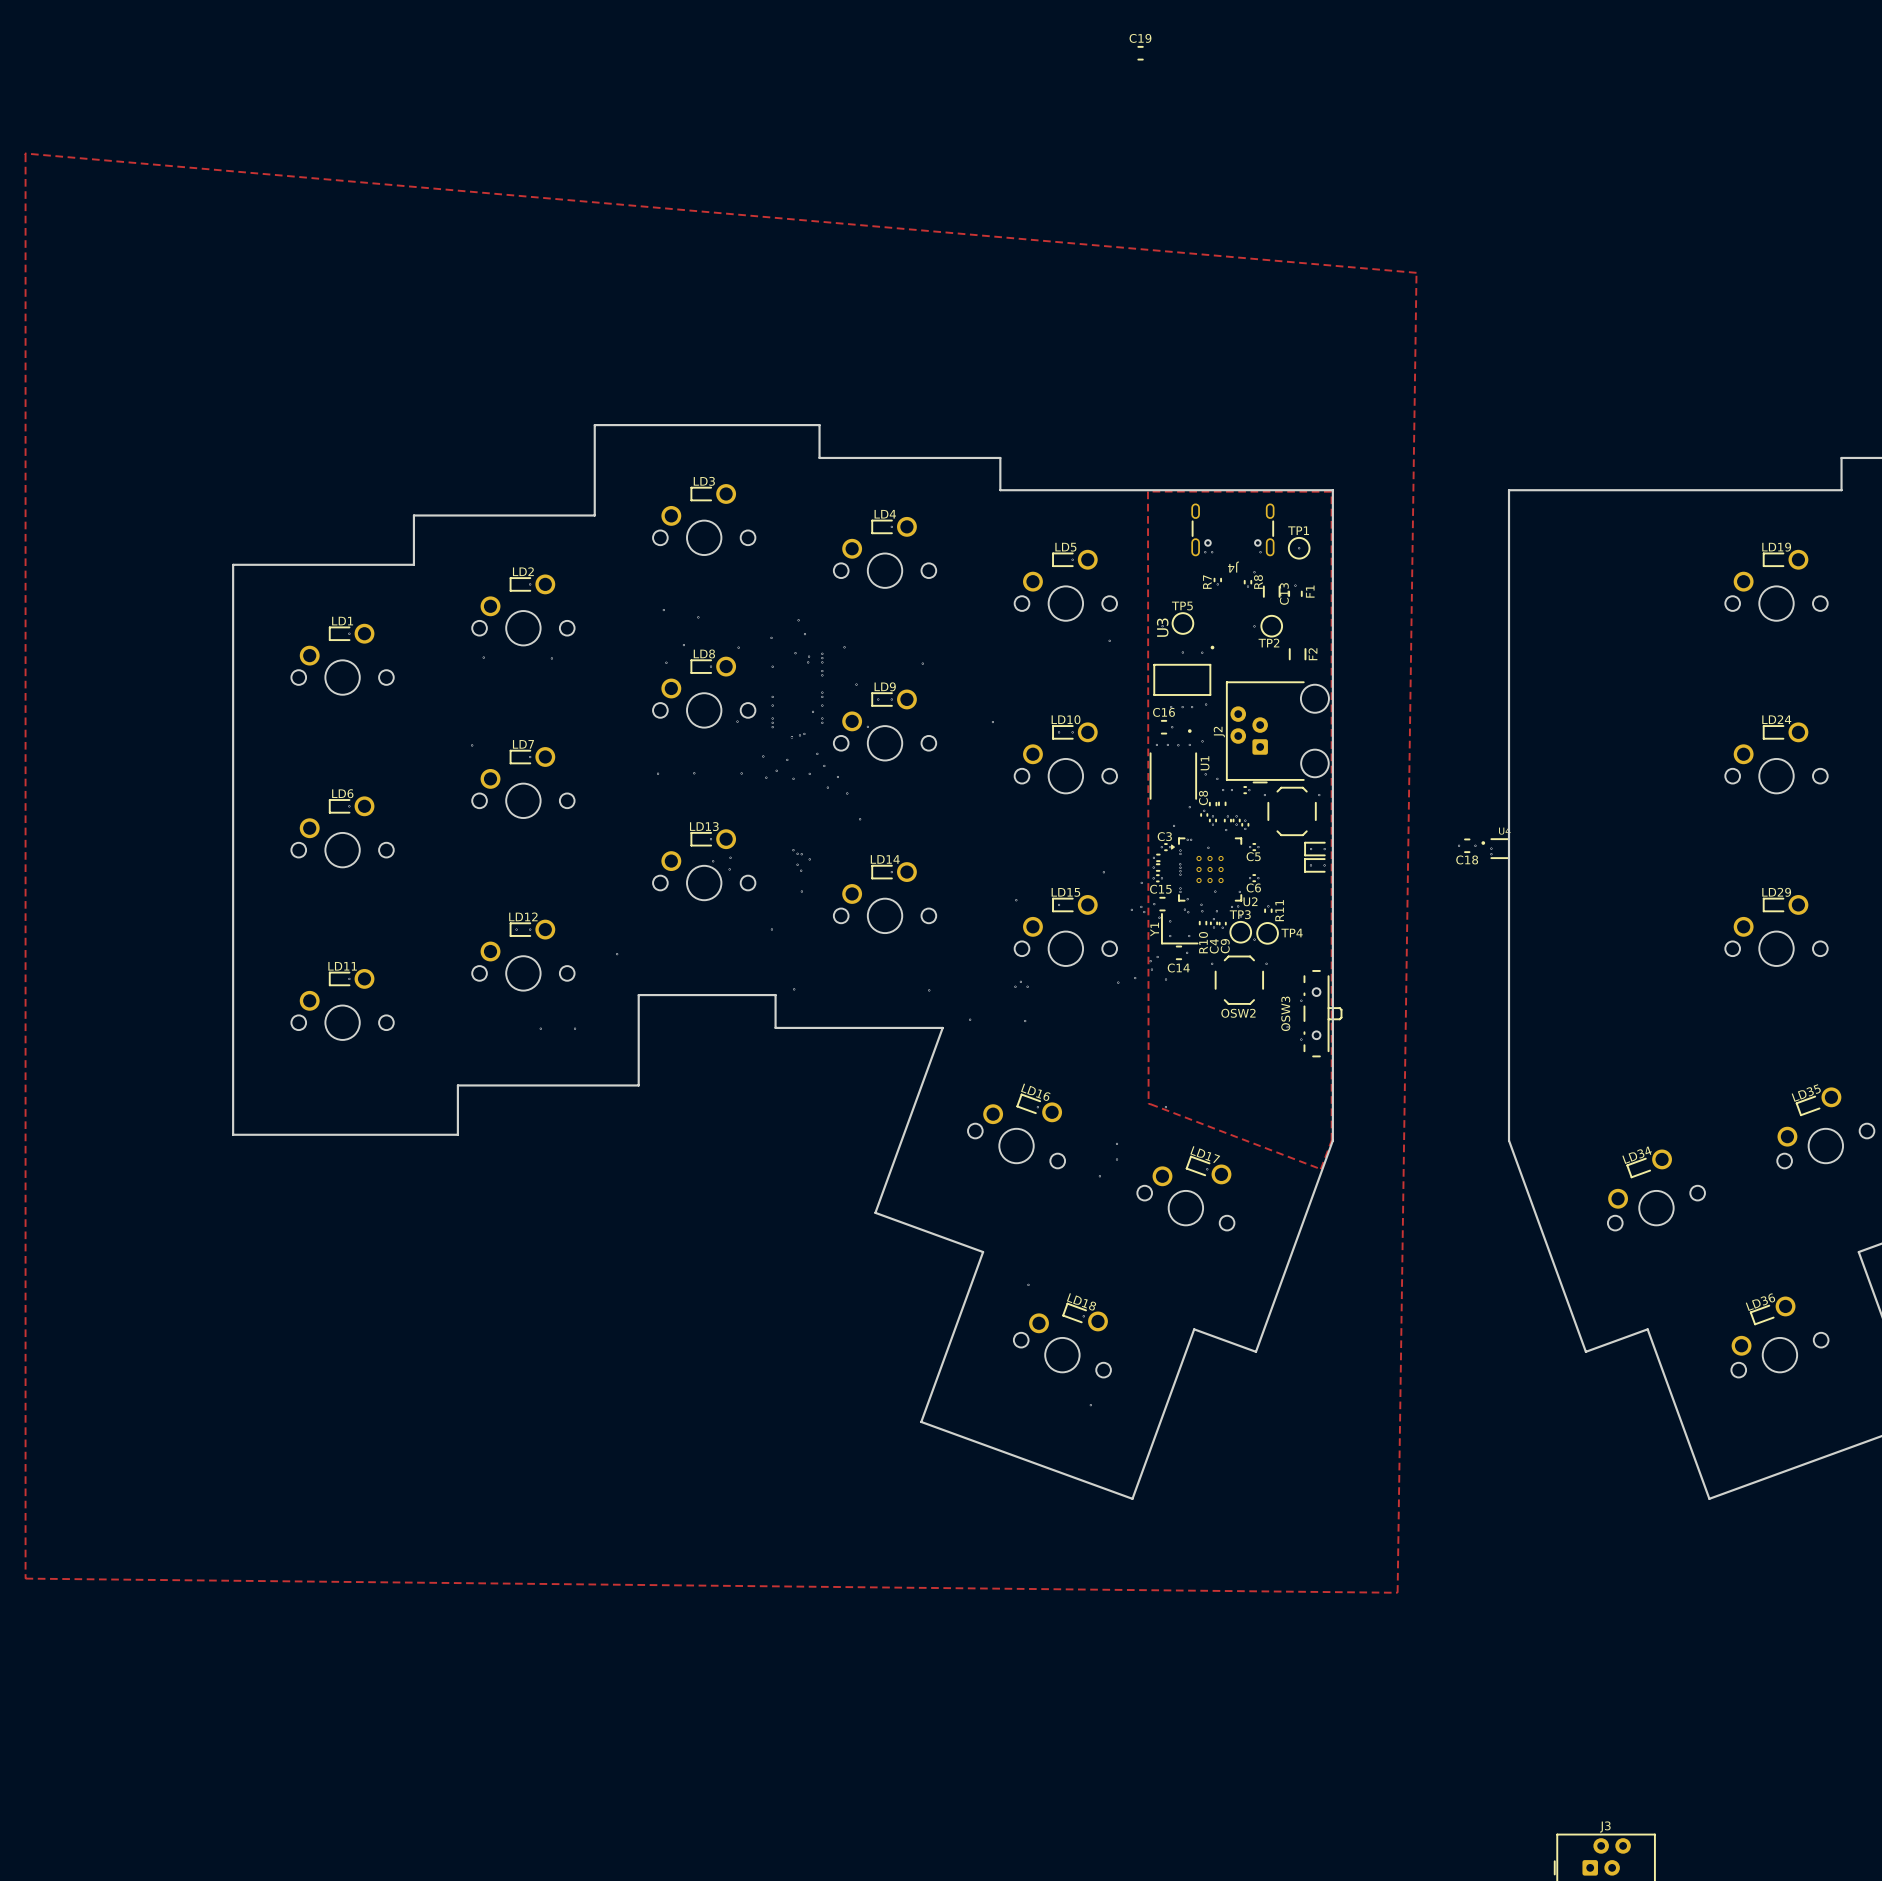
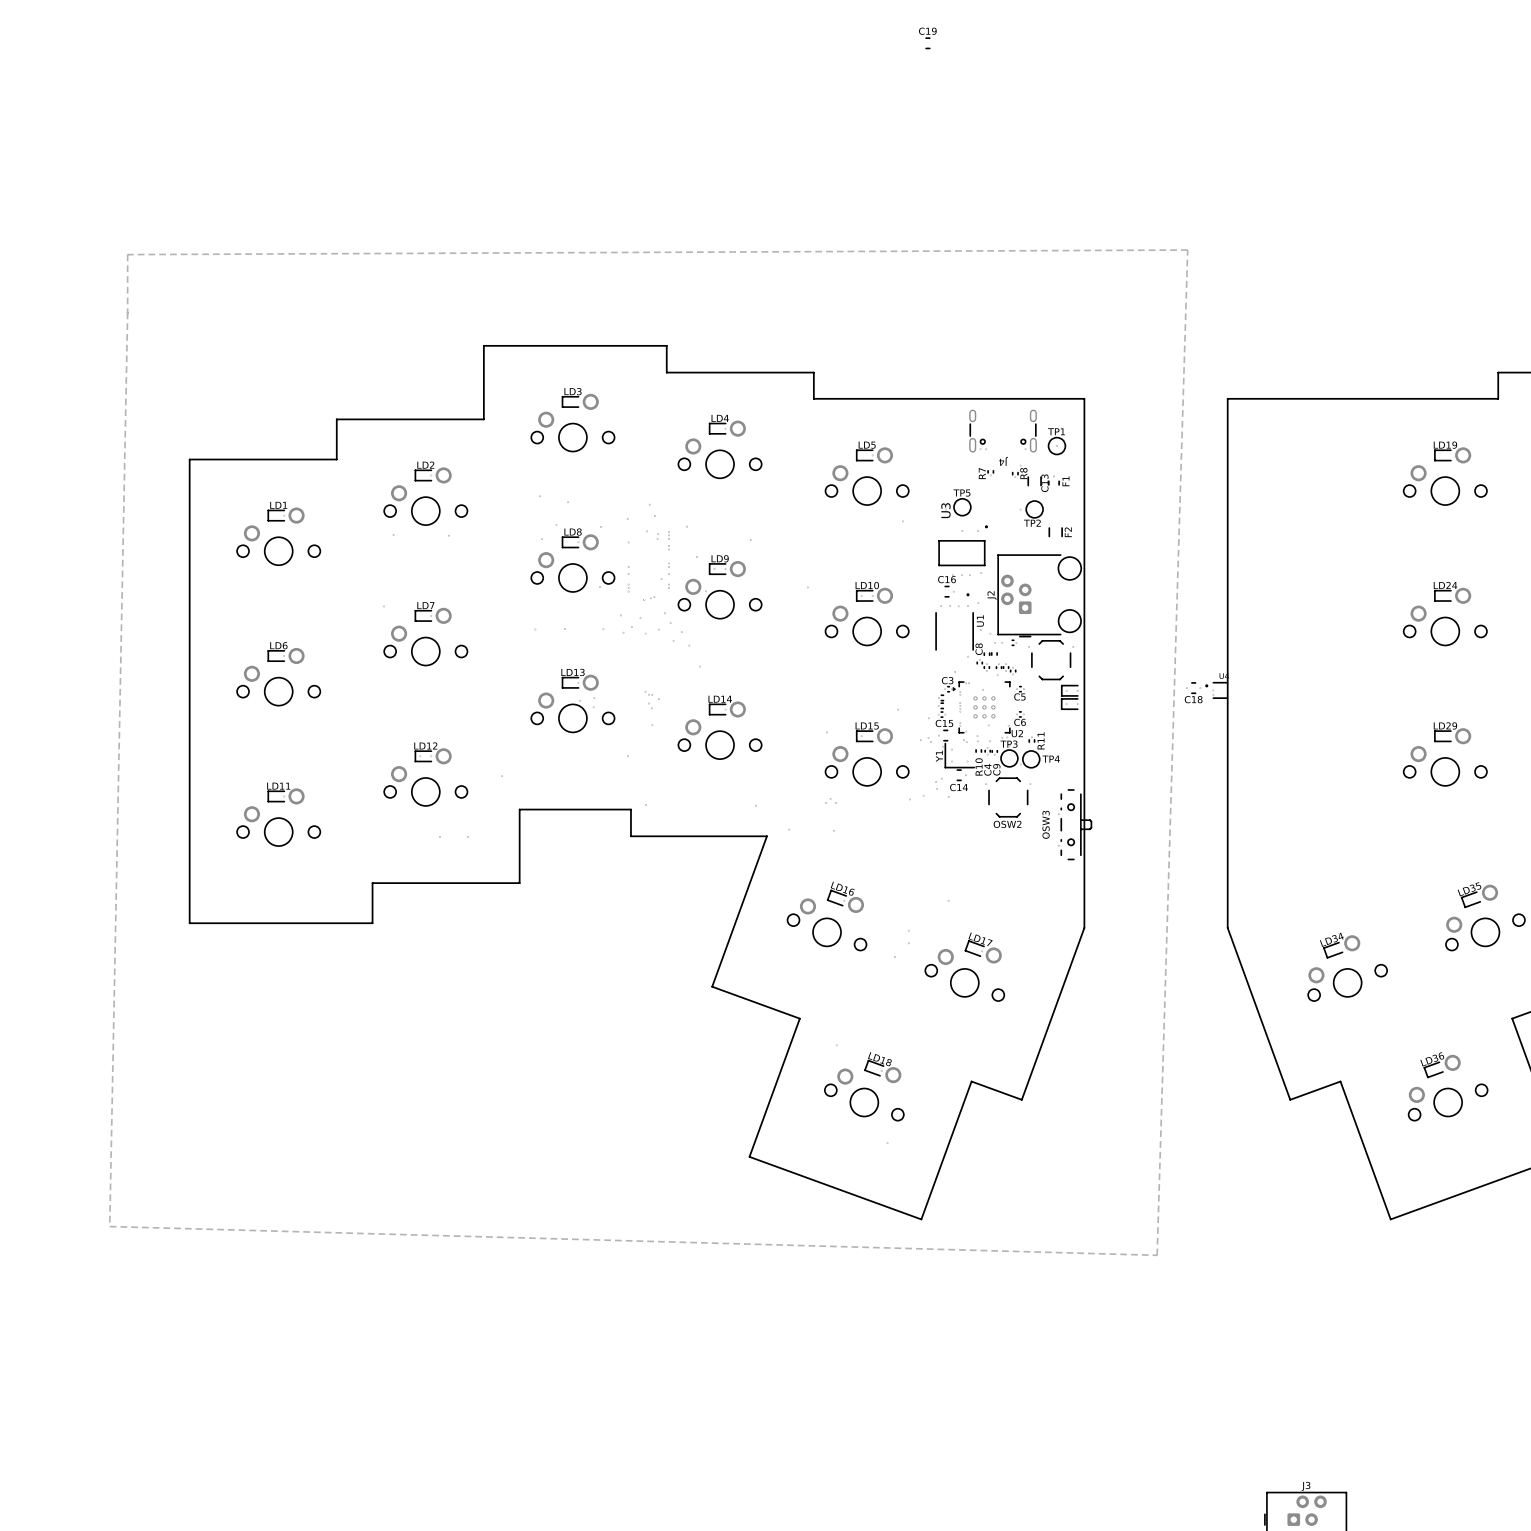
zone outline: (24, 153) (1416, 272) (1397, 1592) (25, 1578) (24, 153) -> none
zone outline: none -> (127, 312) (109, 1226) (1157, 1255) (1187, 250) (127, 254) (127, 313)
zone outline: (1147, 491) (1331, 491) (1331, 1140) (1320, 1169) (1148, 1103) (1147, 491) -> none

